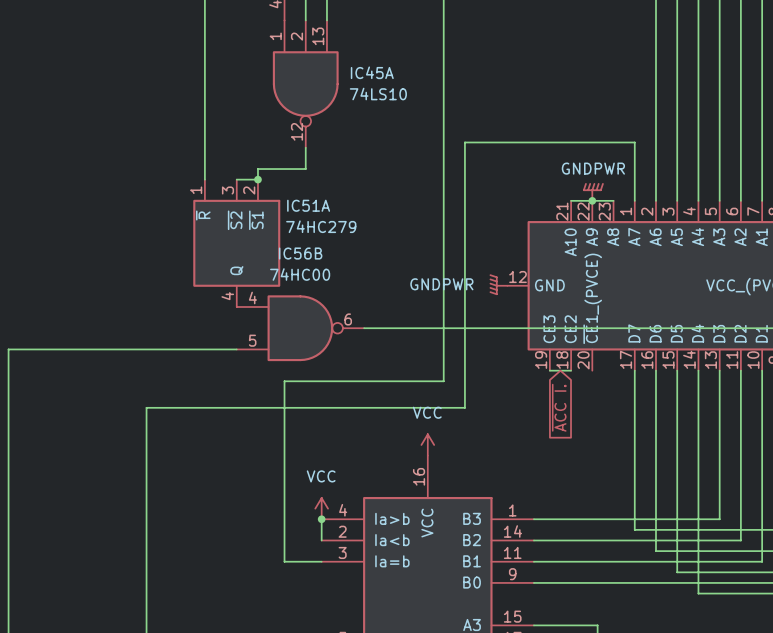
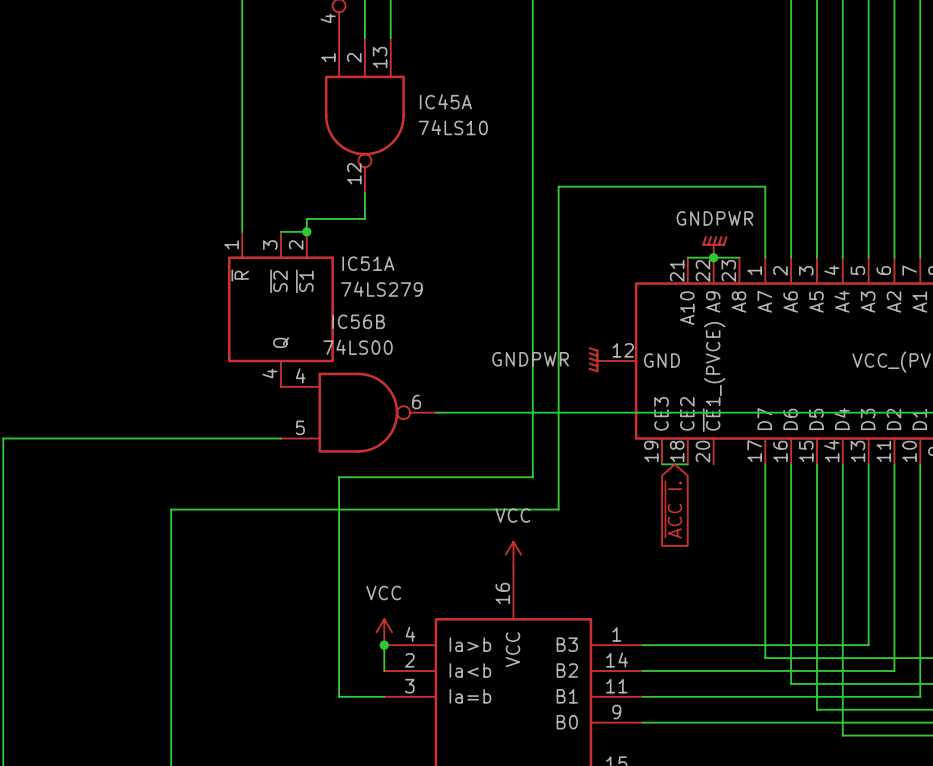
IC51A value: 74HC279 (321, 226) -> 74LS279 (381, 289)
IC56B value: 74HC00 (300, 274) -> 74LS00 (358, 347)

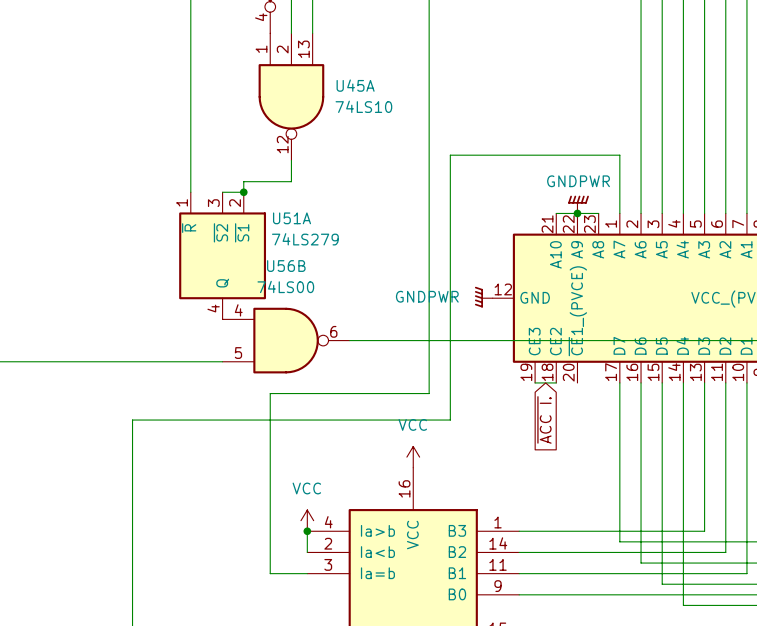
IC45A name: IC45A (445, 101) -> U45A (355, 85)
IC51A name: IC51A (368, 263) -> U51A (292, 218)
IC56B name: IC56B (358, 321) -> U56B (286, 266)

